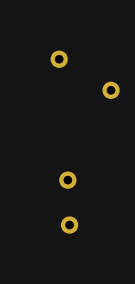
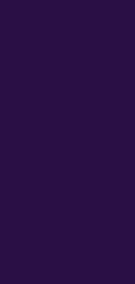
part: (59, 59) -> none
part: (111, 90) -> none
part: (67, 180) -> none
part: (69, 225) -> none

